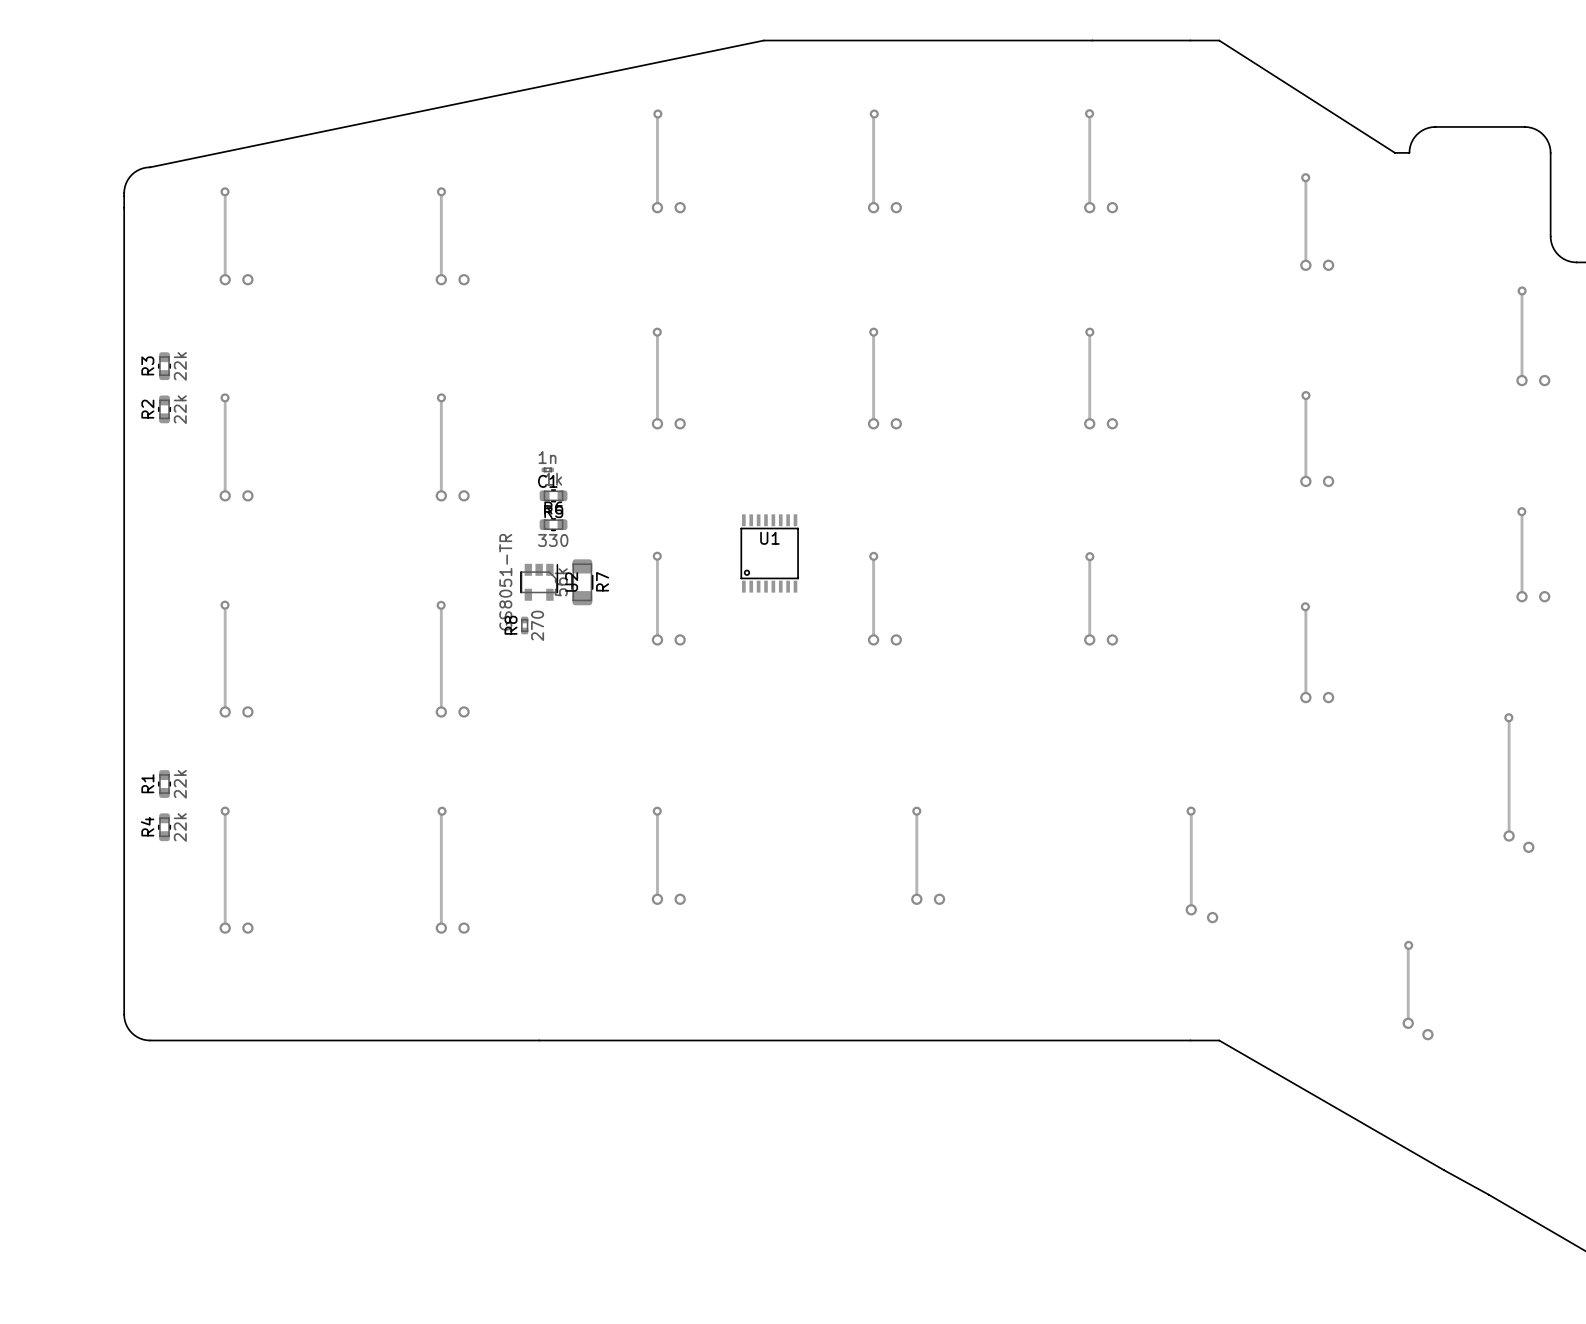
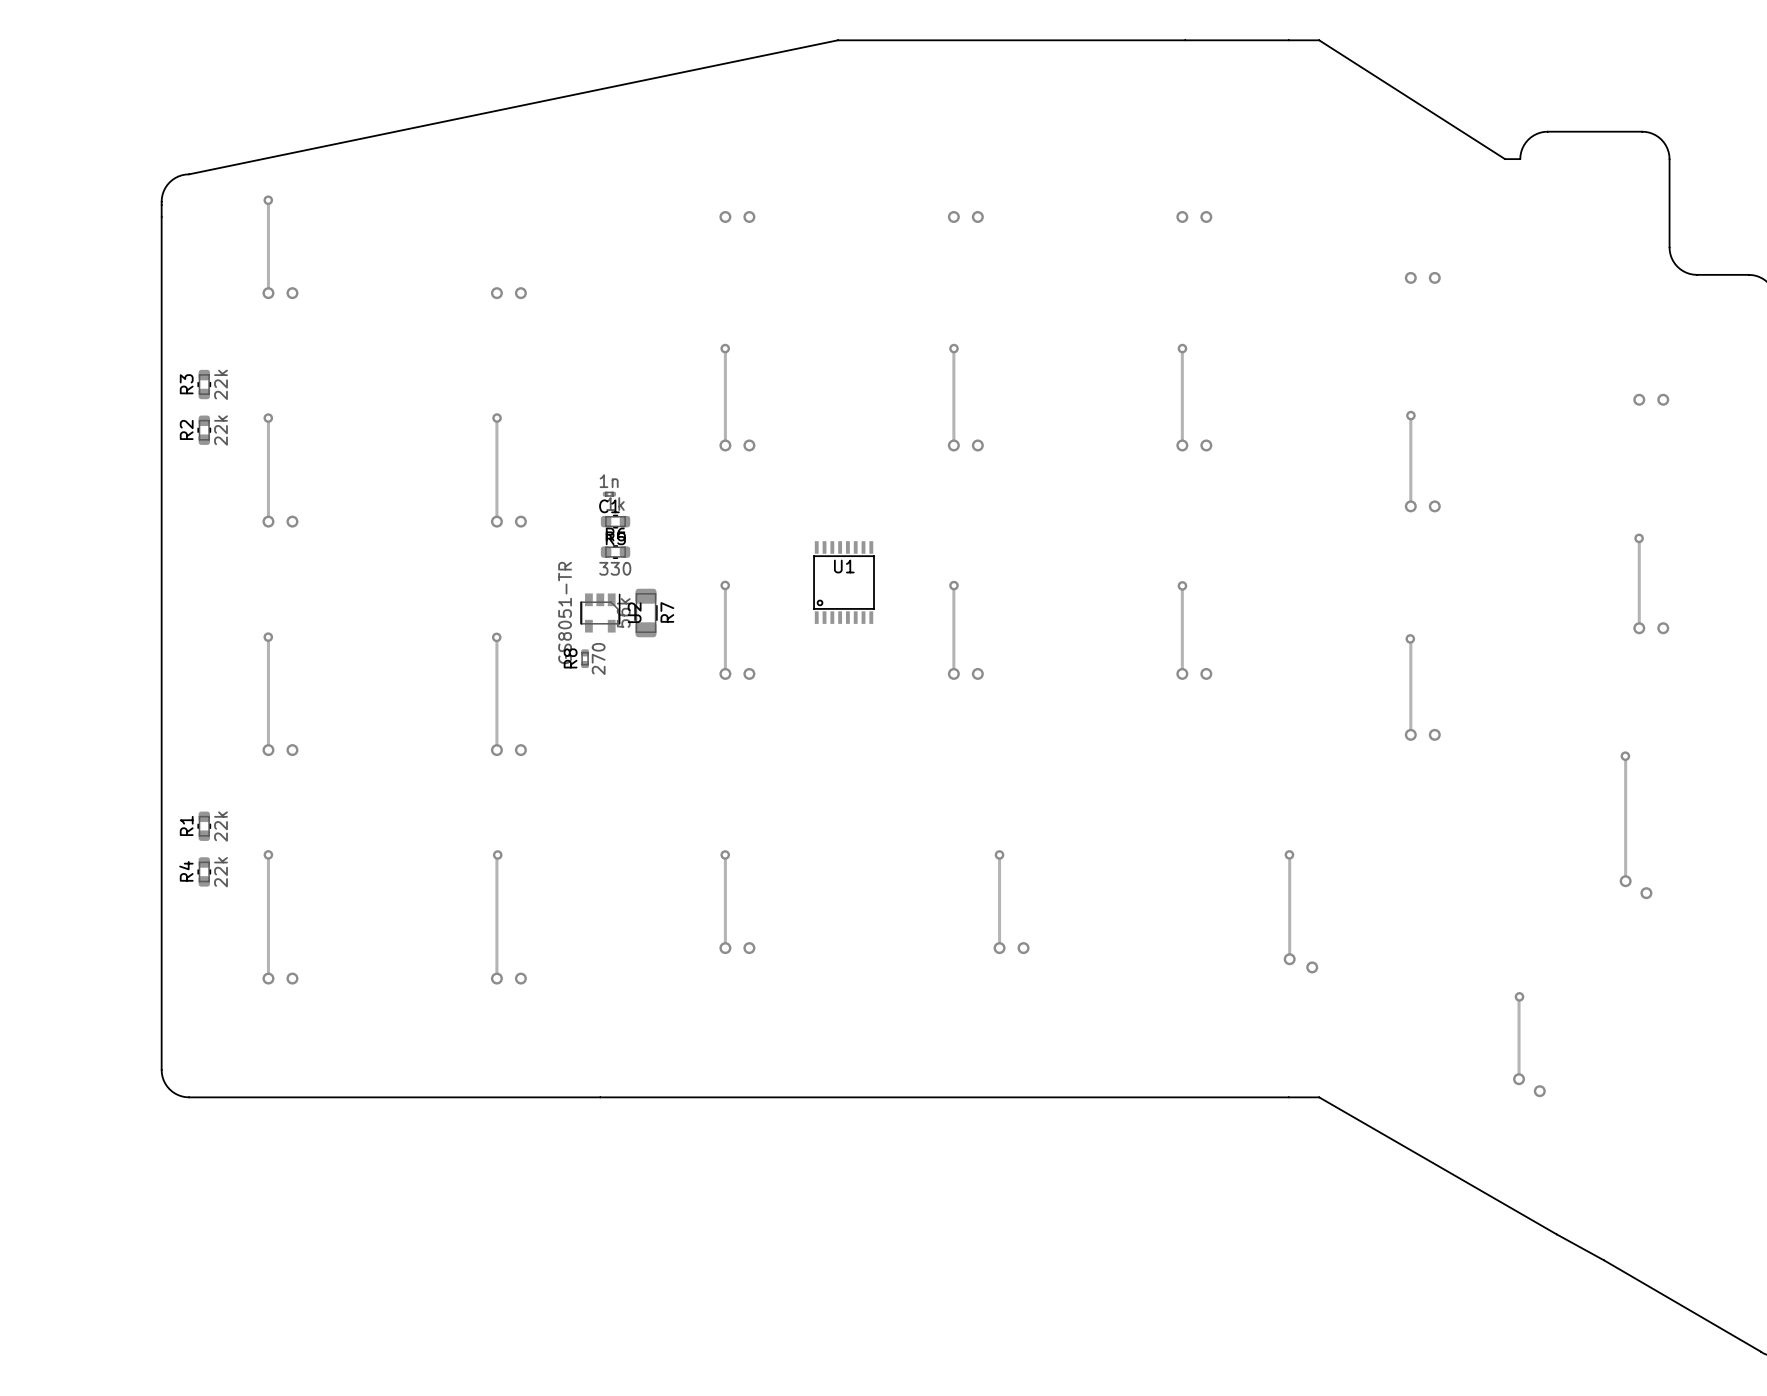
track: (1089, 113) (1089, 207) -> none
via: (1089, 113) -> none
track: (657, 114) (657, 207) -> none
via: (657, 114) -> none
track: (874, 114) (873, 207) -> none
via: (874, 114) -> none
track: (1305, 177) (1305, 265) -> none
via: (1305, 177) -> none
track: (441, 191) (441, 279) -> none
via: (441, 191) -> none
via: (1522, 290) -> none
track: (1522, 291) (1522, 380) -> none

